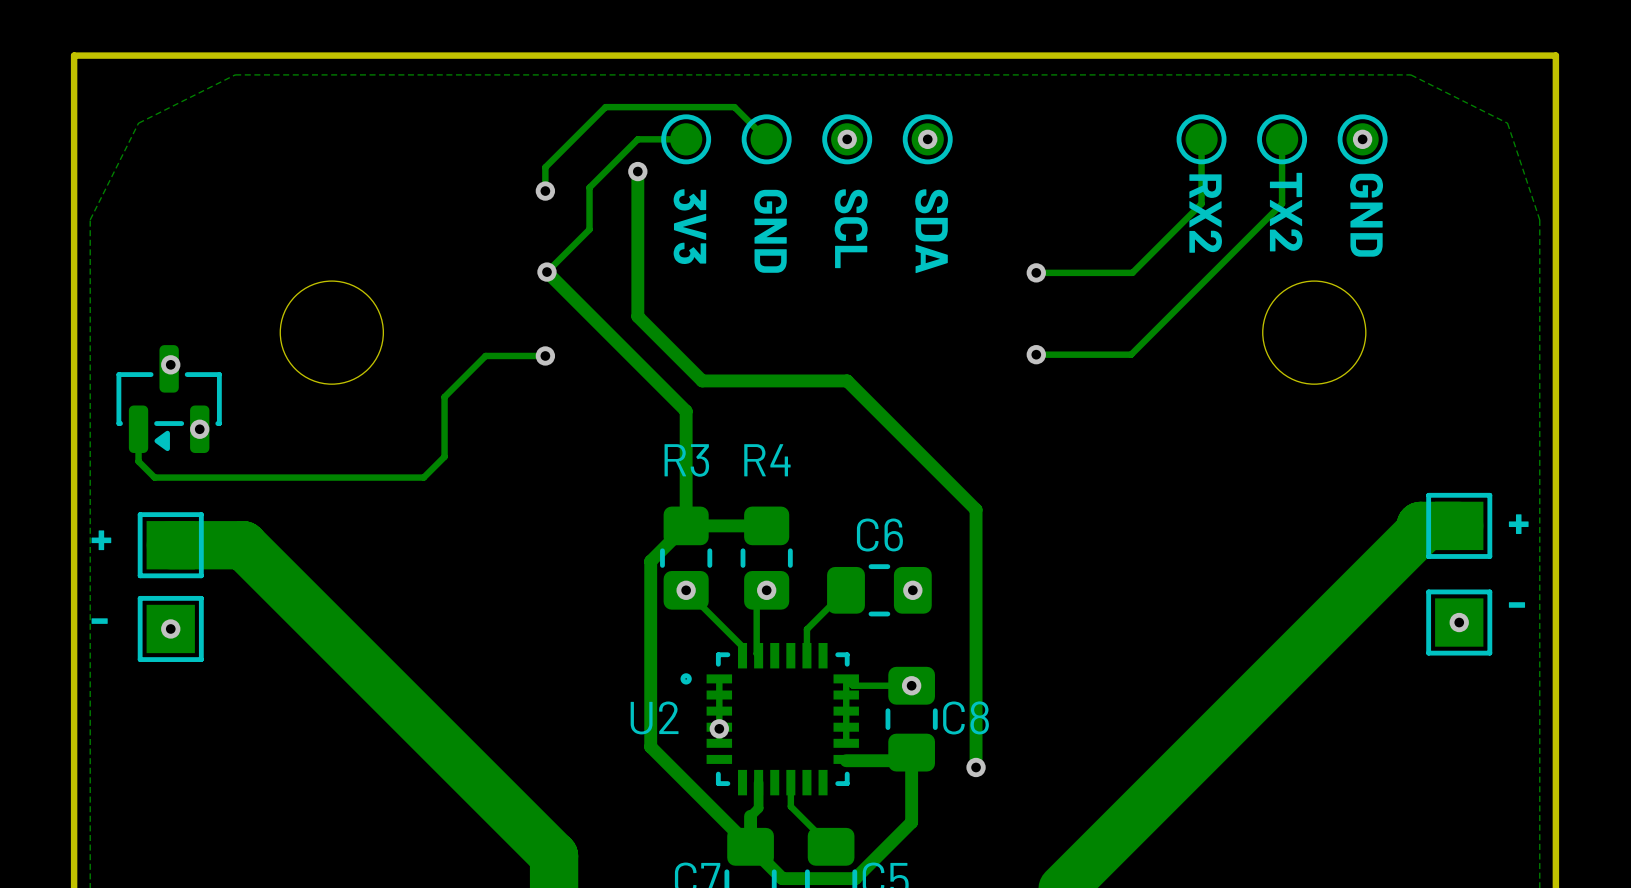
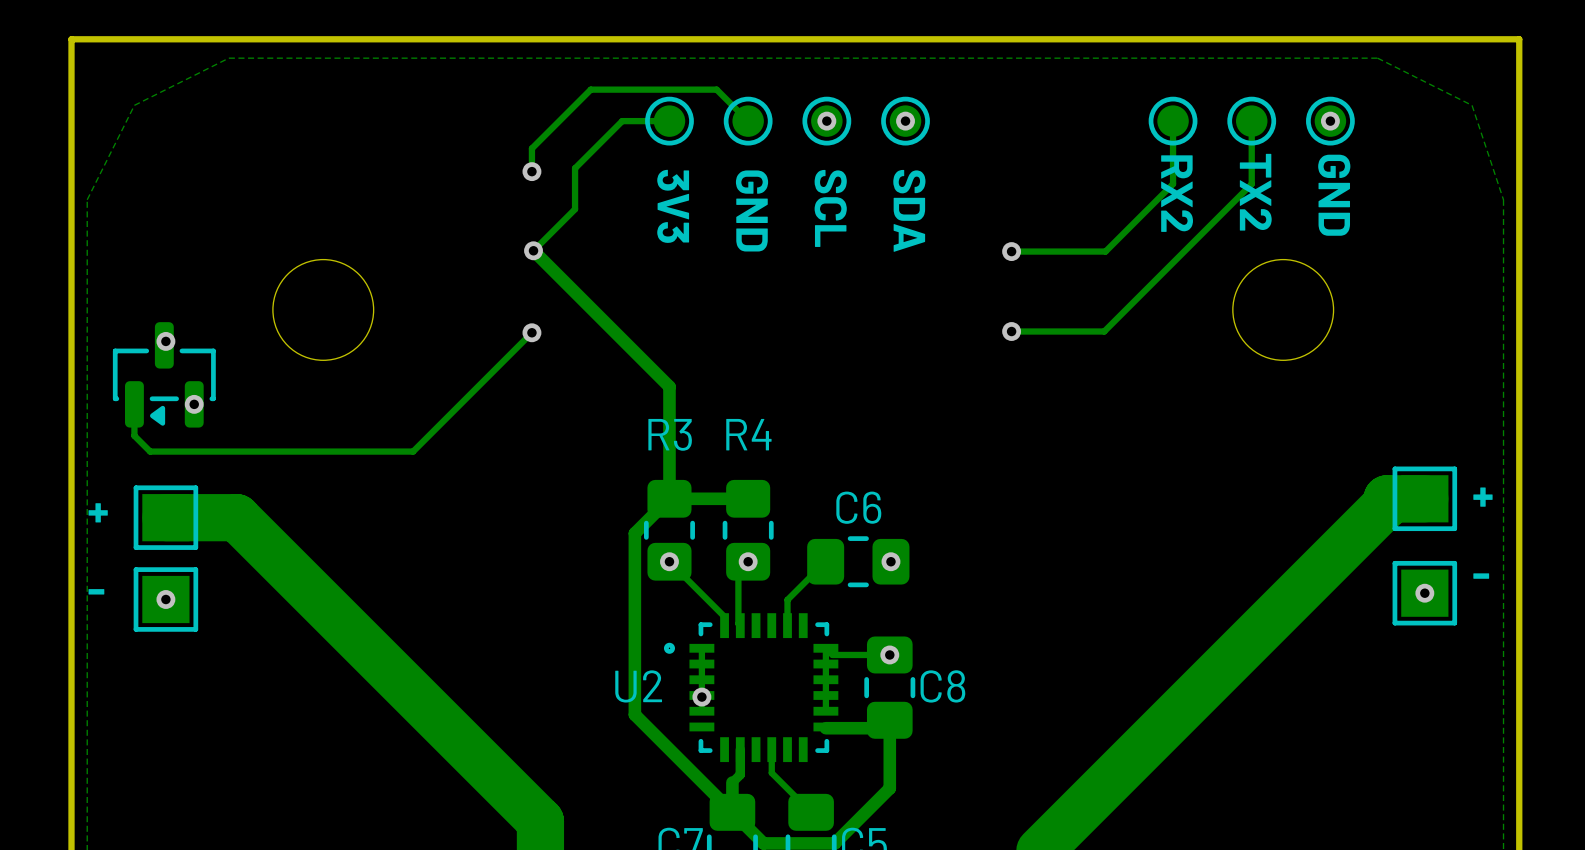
track: (637, 171) (637, 316) (702, 380) (847, 380) (976, 509) (976, 767) -> none
via: (637, 171) -> none
track: (545, 355) (485, 355) (444, 397) (444, 456) -> (531, 332) (433, 431)
via: (976, 767) -> none

